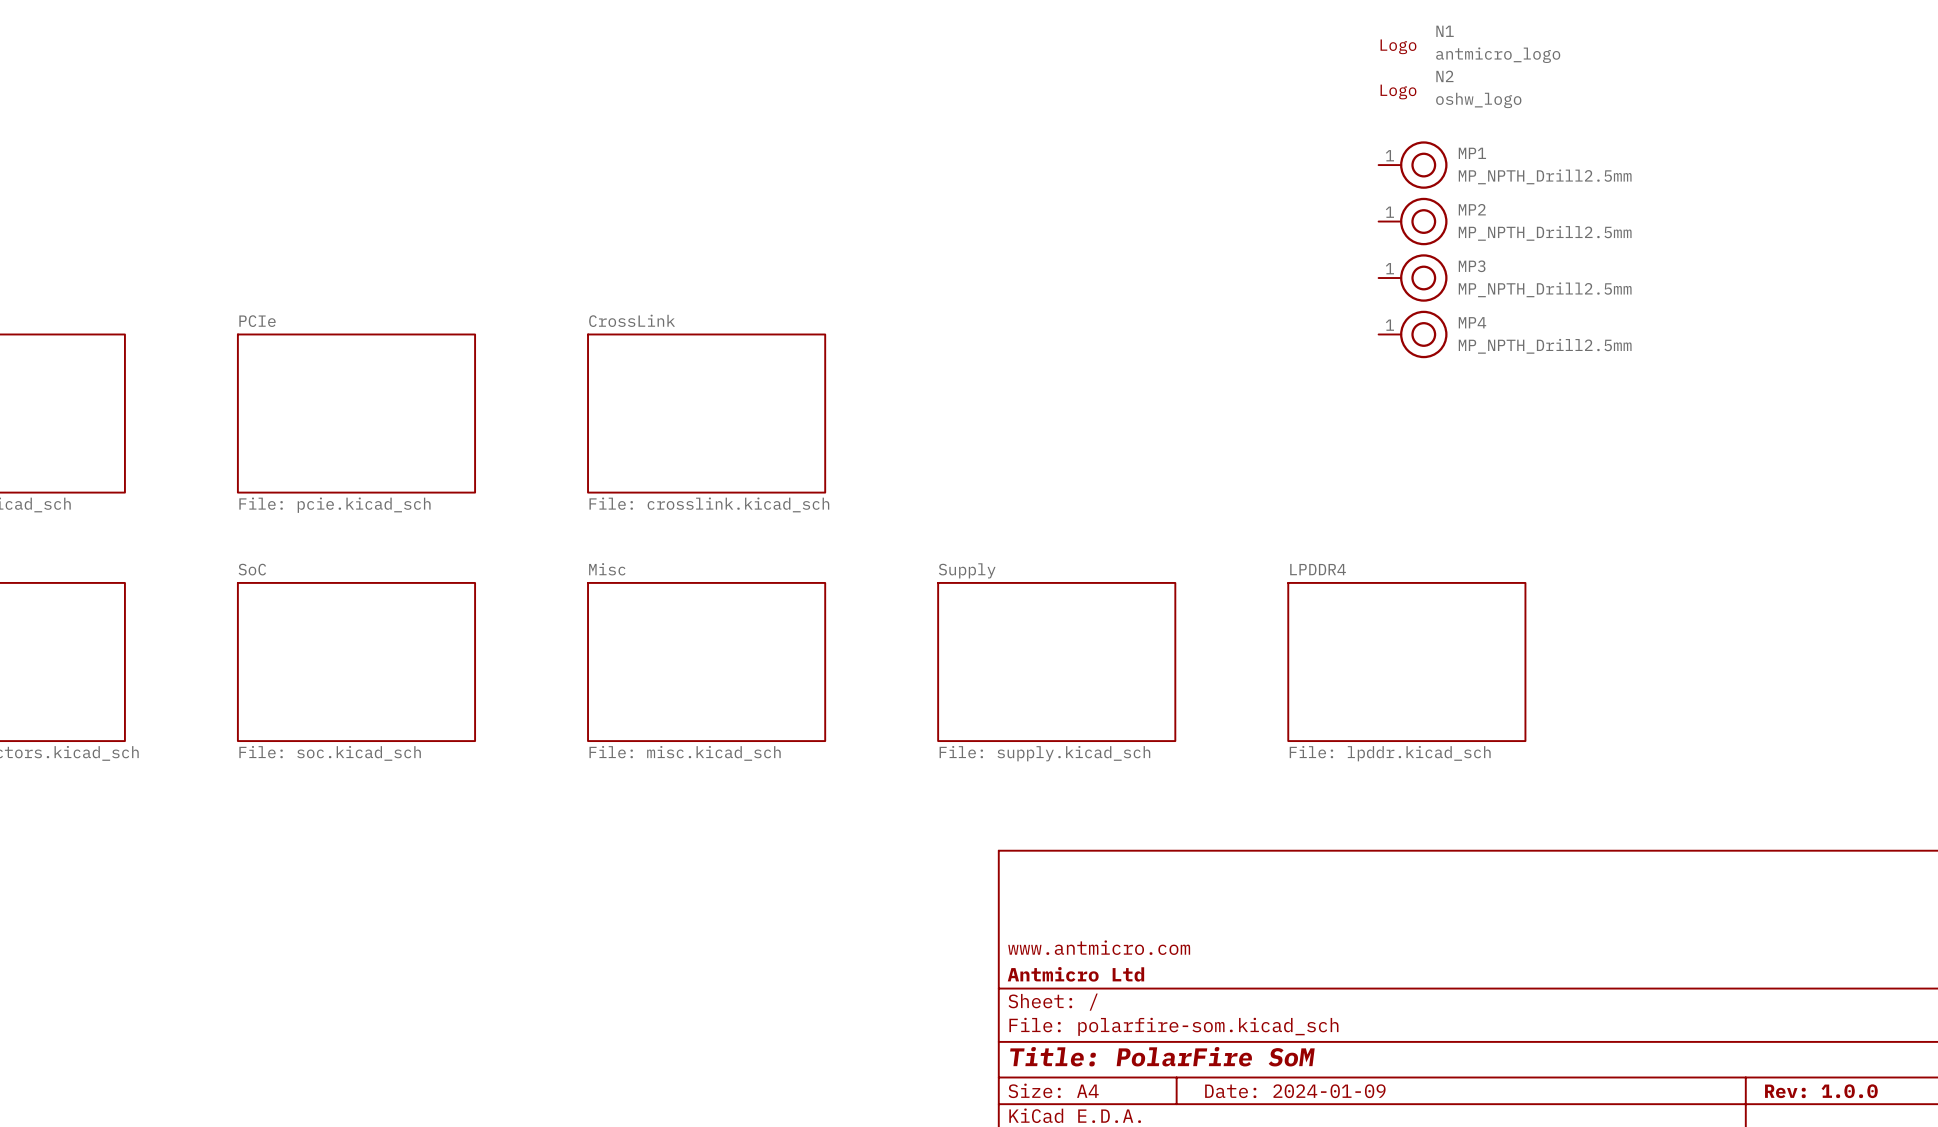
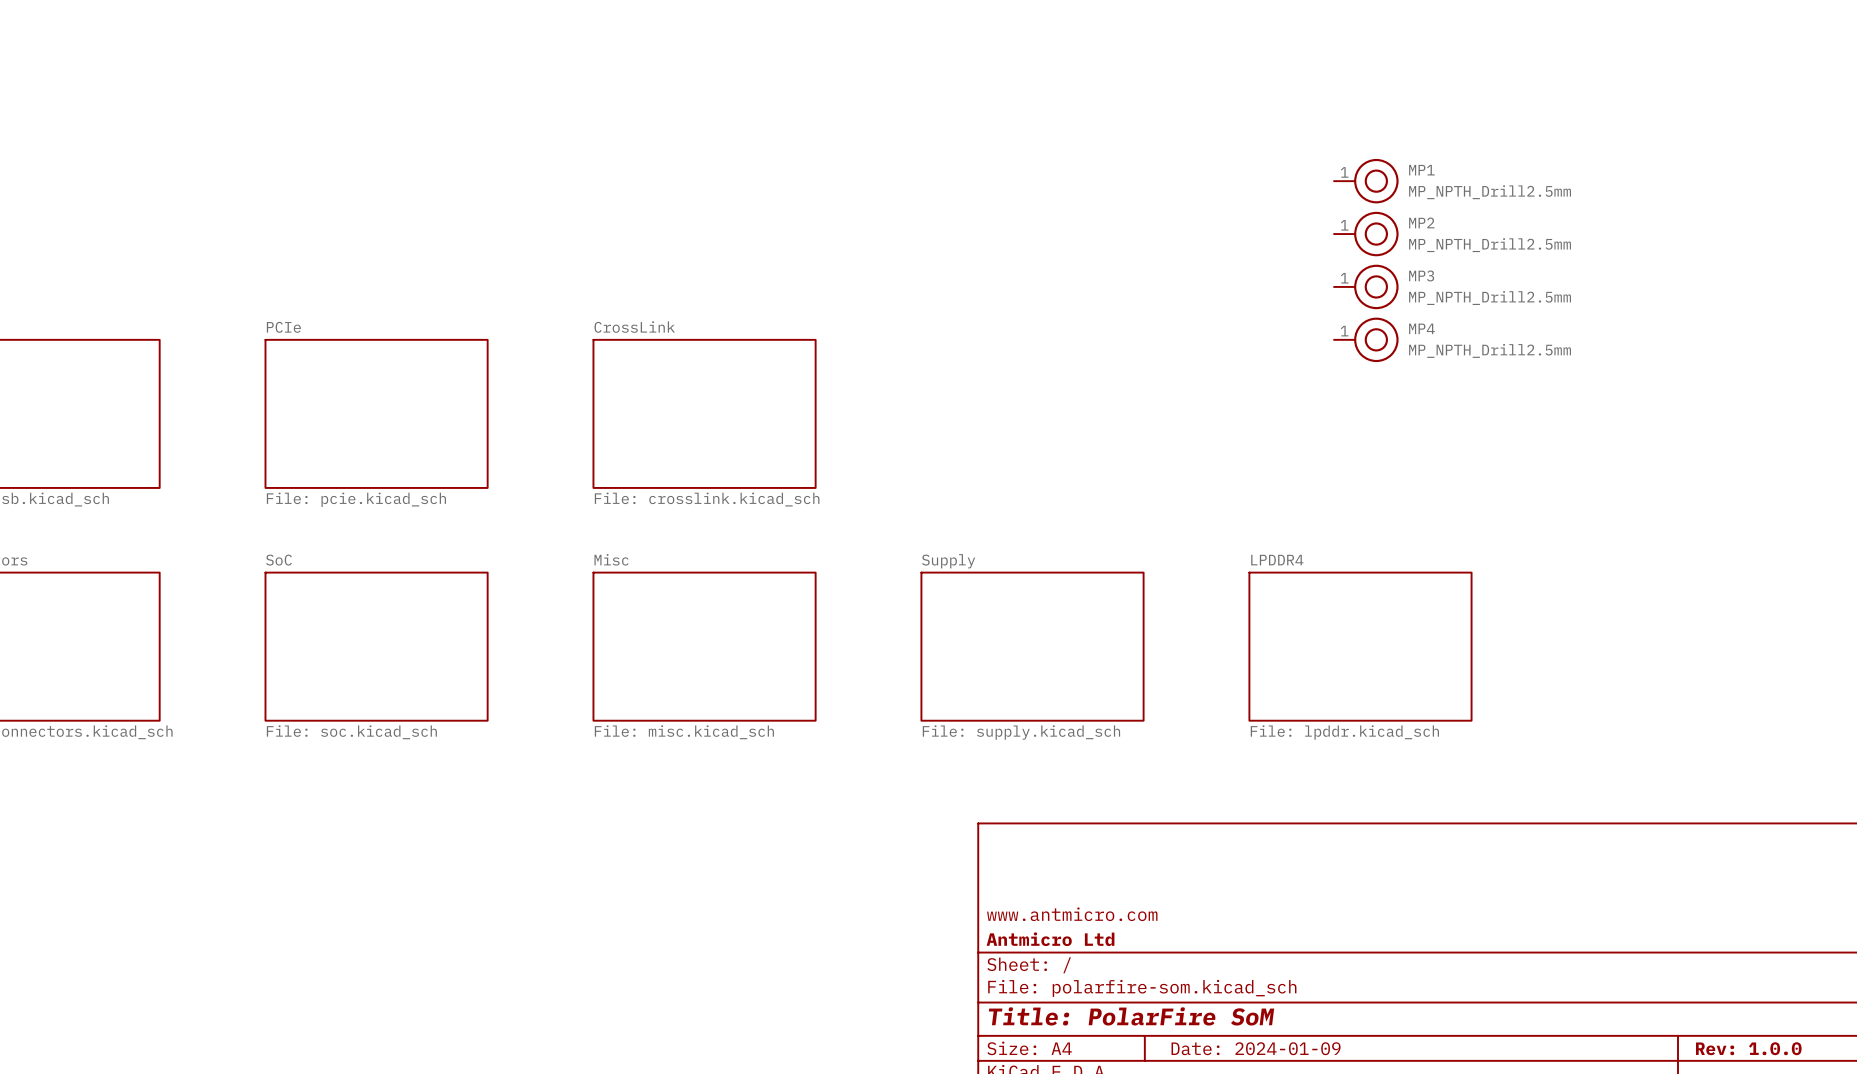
N1: antmicro_logo (1470, 44) -> none
N2: oshw_logo (1450, 89) -> none

